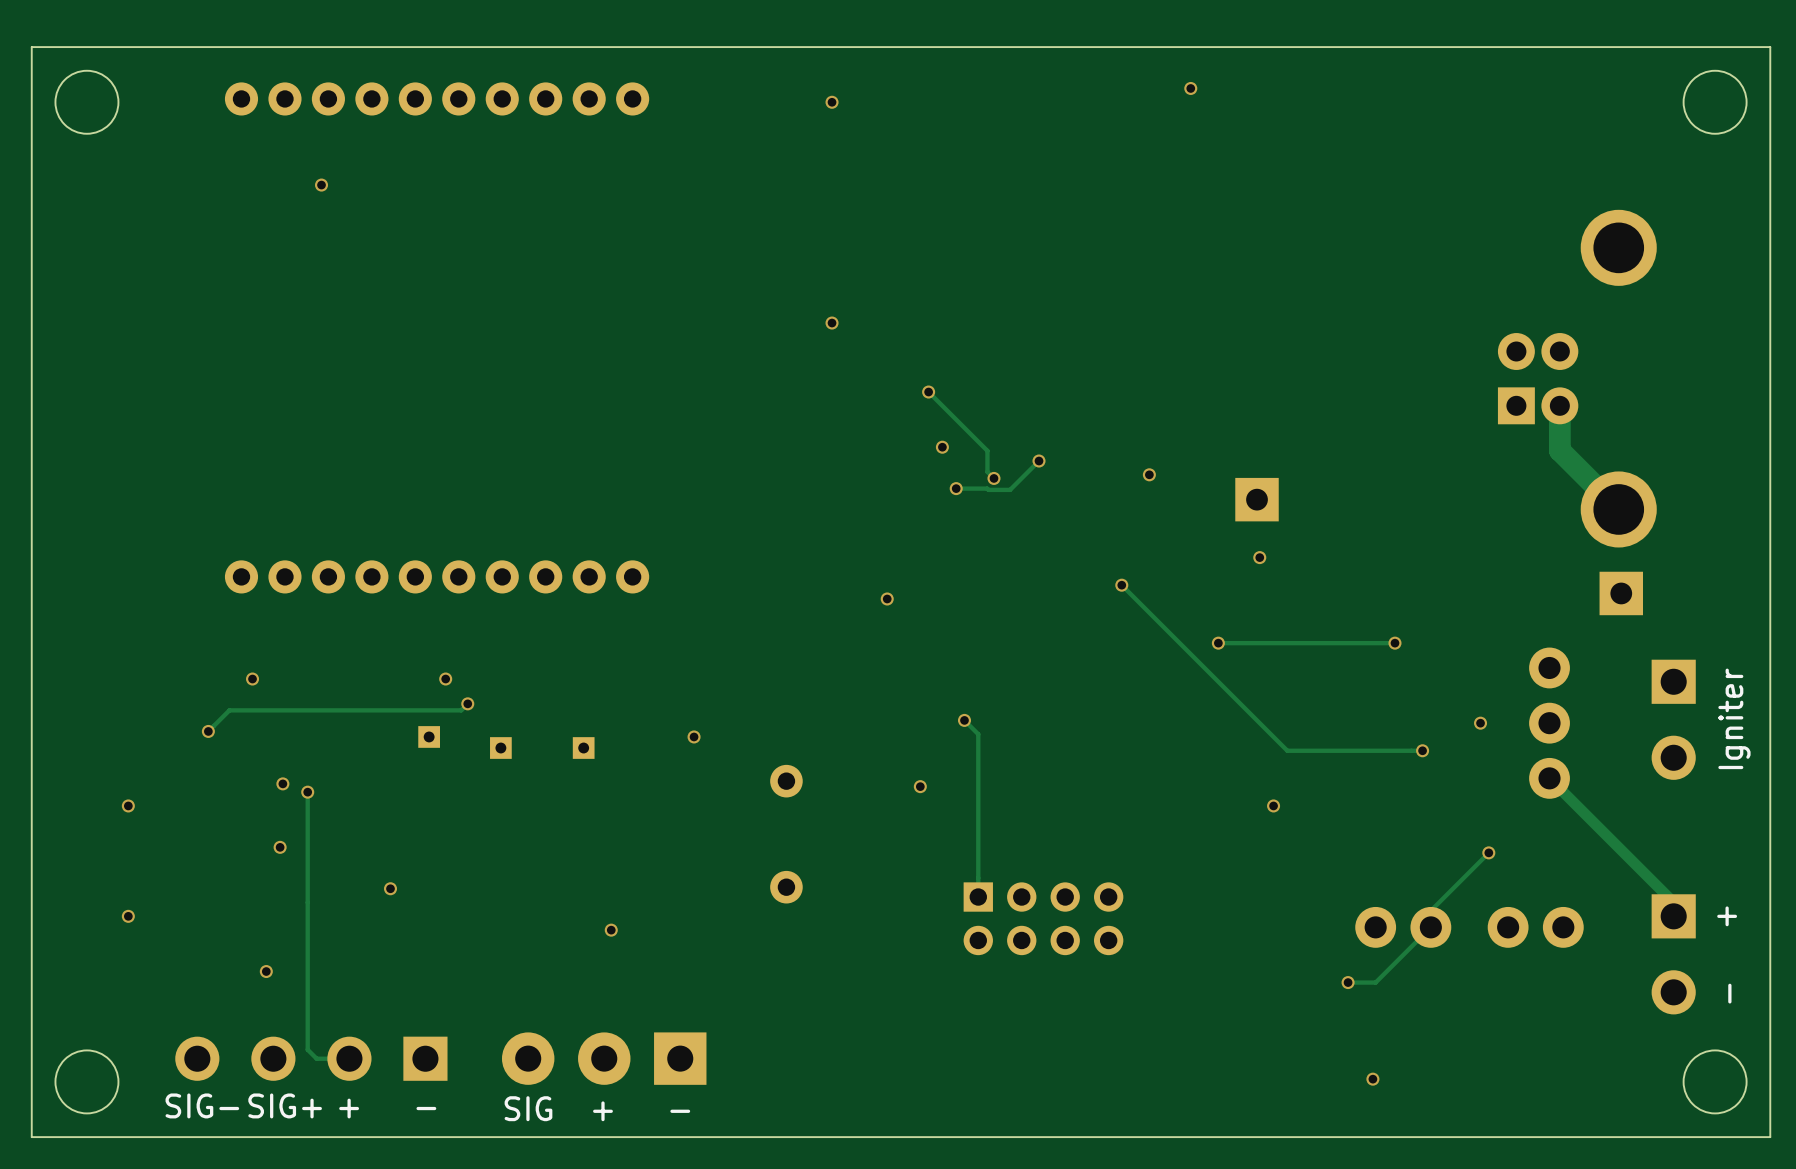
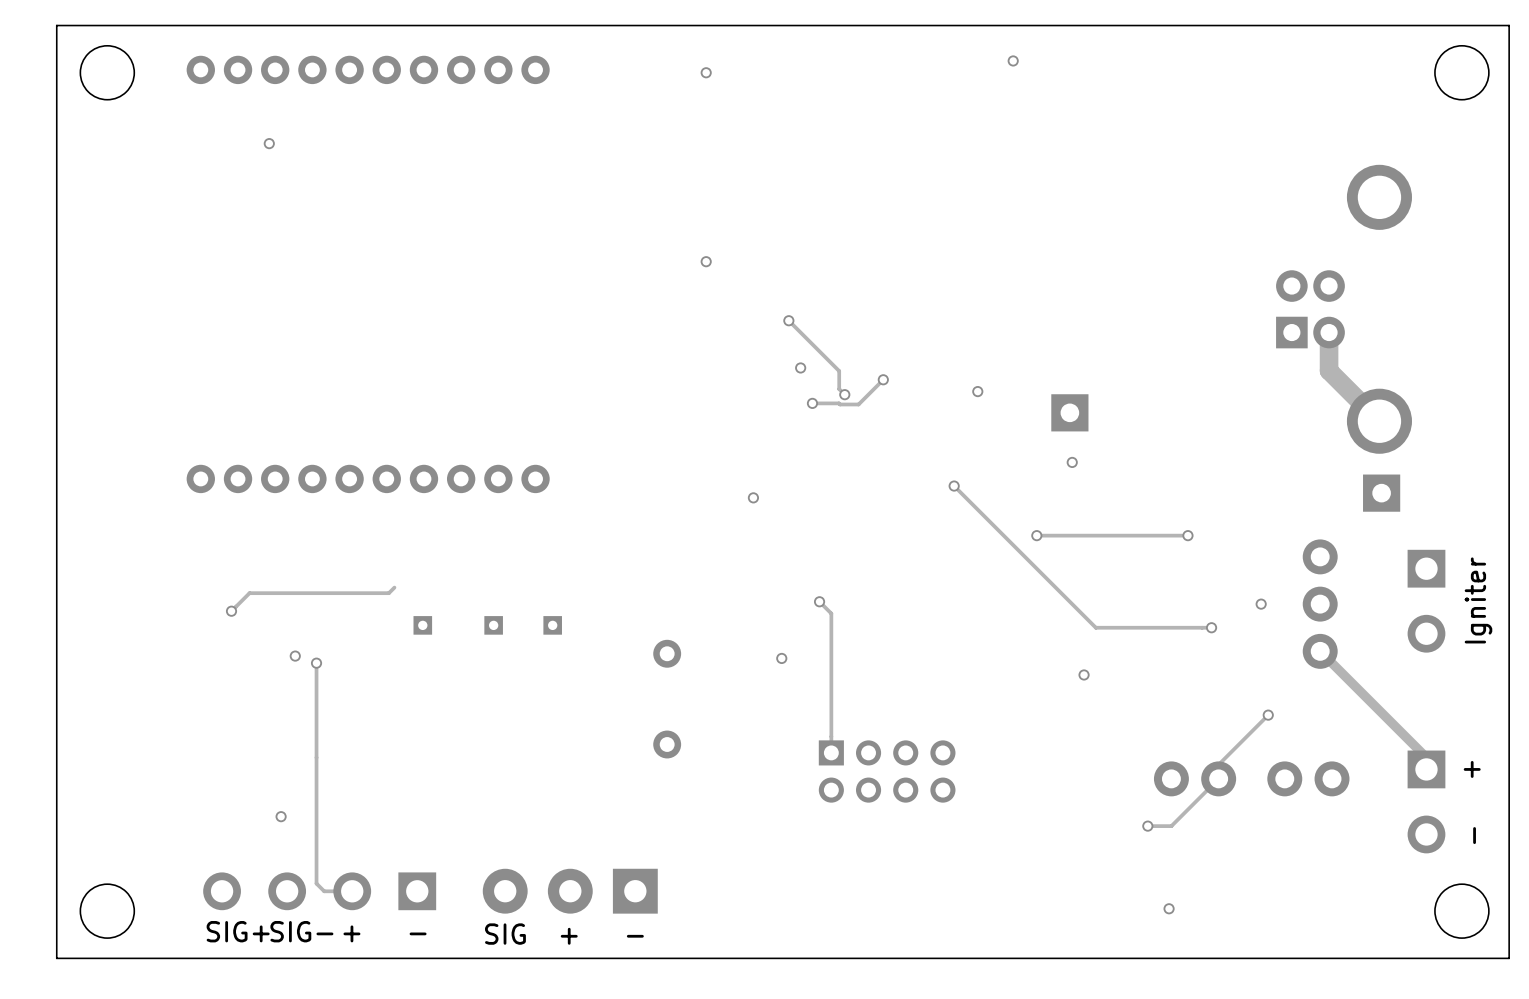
board edge: (73, 47) (31, 47) (31, 1137) (73, 1137) -> (56, 25) (56, 958)
round board edge position: (86, 102) -> (107, 72)
via: (252, 679) -> none
via: (445, 679) -> none
via: (467, 703) -> none
track: (298, 710) (229, 710) (208, 731) -> (249, 593) (231, 611)
via: (208, 731) -> none
via: none -> (231, 611)
part position: (429, 736) -> (552, 625)
via: (694, 736) -> none
via: (282, 783) -> none
via: none -> (295, 656)
track: (307, 792) (307, 1049) (316, 1058) (349, 1058) -> (316, 663) (316, 883) (324, 891) (352, 891)
via: (307, 792) -> none
via: none -> (316, 663)
via: (128, 805) -> none
via: (280, 847) -> none
via: (390, 888) -> none
via: (128, 916) -> none
via: (611, 930) -> none
via: (266, 971) -> none
via: none -> (281, 816)
part position: (311, 1058) -> (319, 891)
part position: (604, 1058) -> (570, 891)
round board edge position: (86, 1081) -> (107, 911)
text position: SIG- (202, 1105) -> SIG- (301, 931)
text position: + (349, 1108) -> + (351, 933)
text position: - (426, 1108) -> - (418, 933)
text position: SIG (528, 1108) -> SIG (505, 934)
text position: + (602, 1111) -> + (569, 936)
text position: - (680, 1111) -> - (635, 936)

